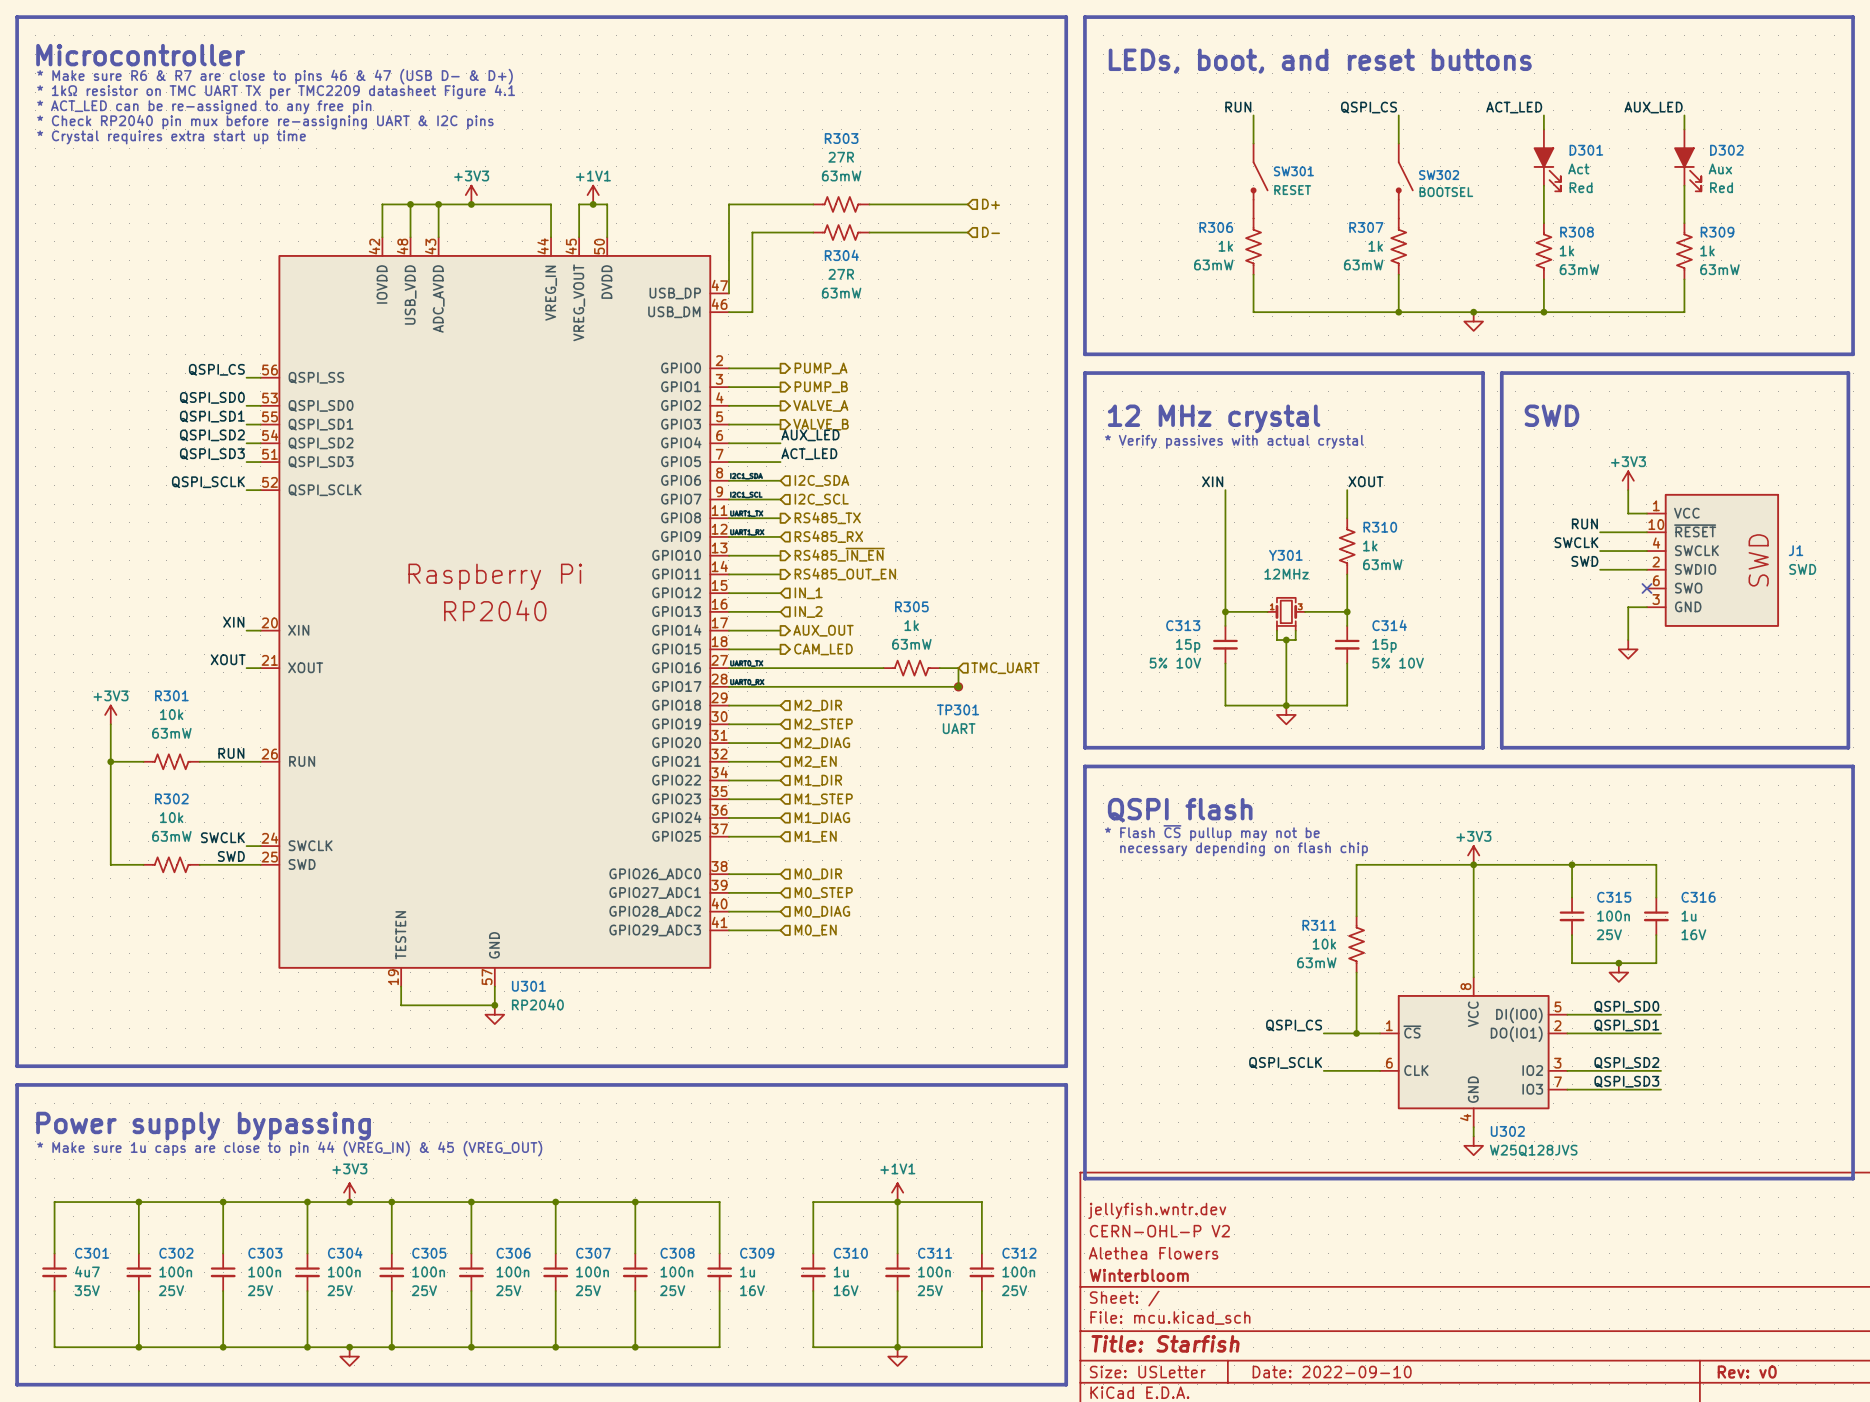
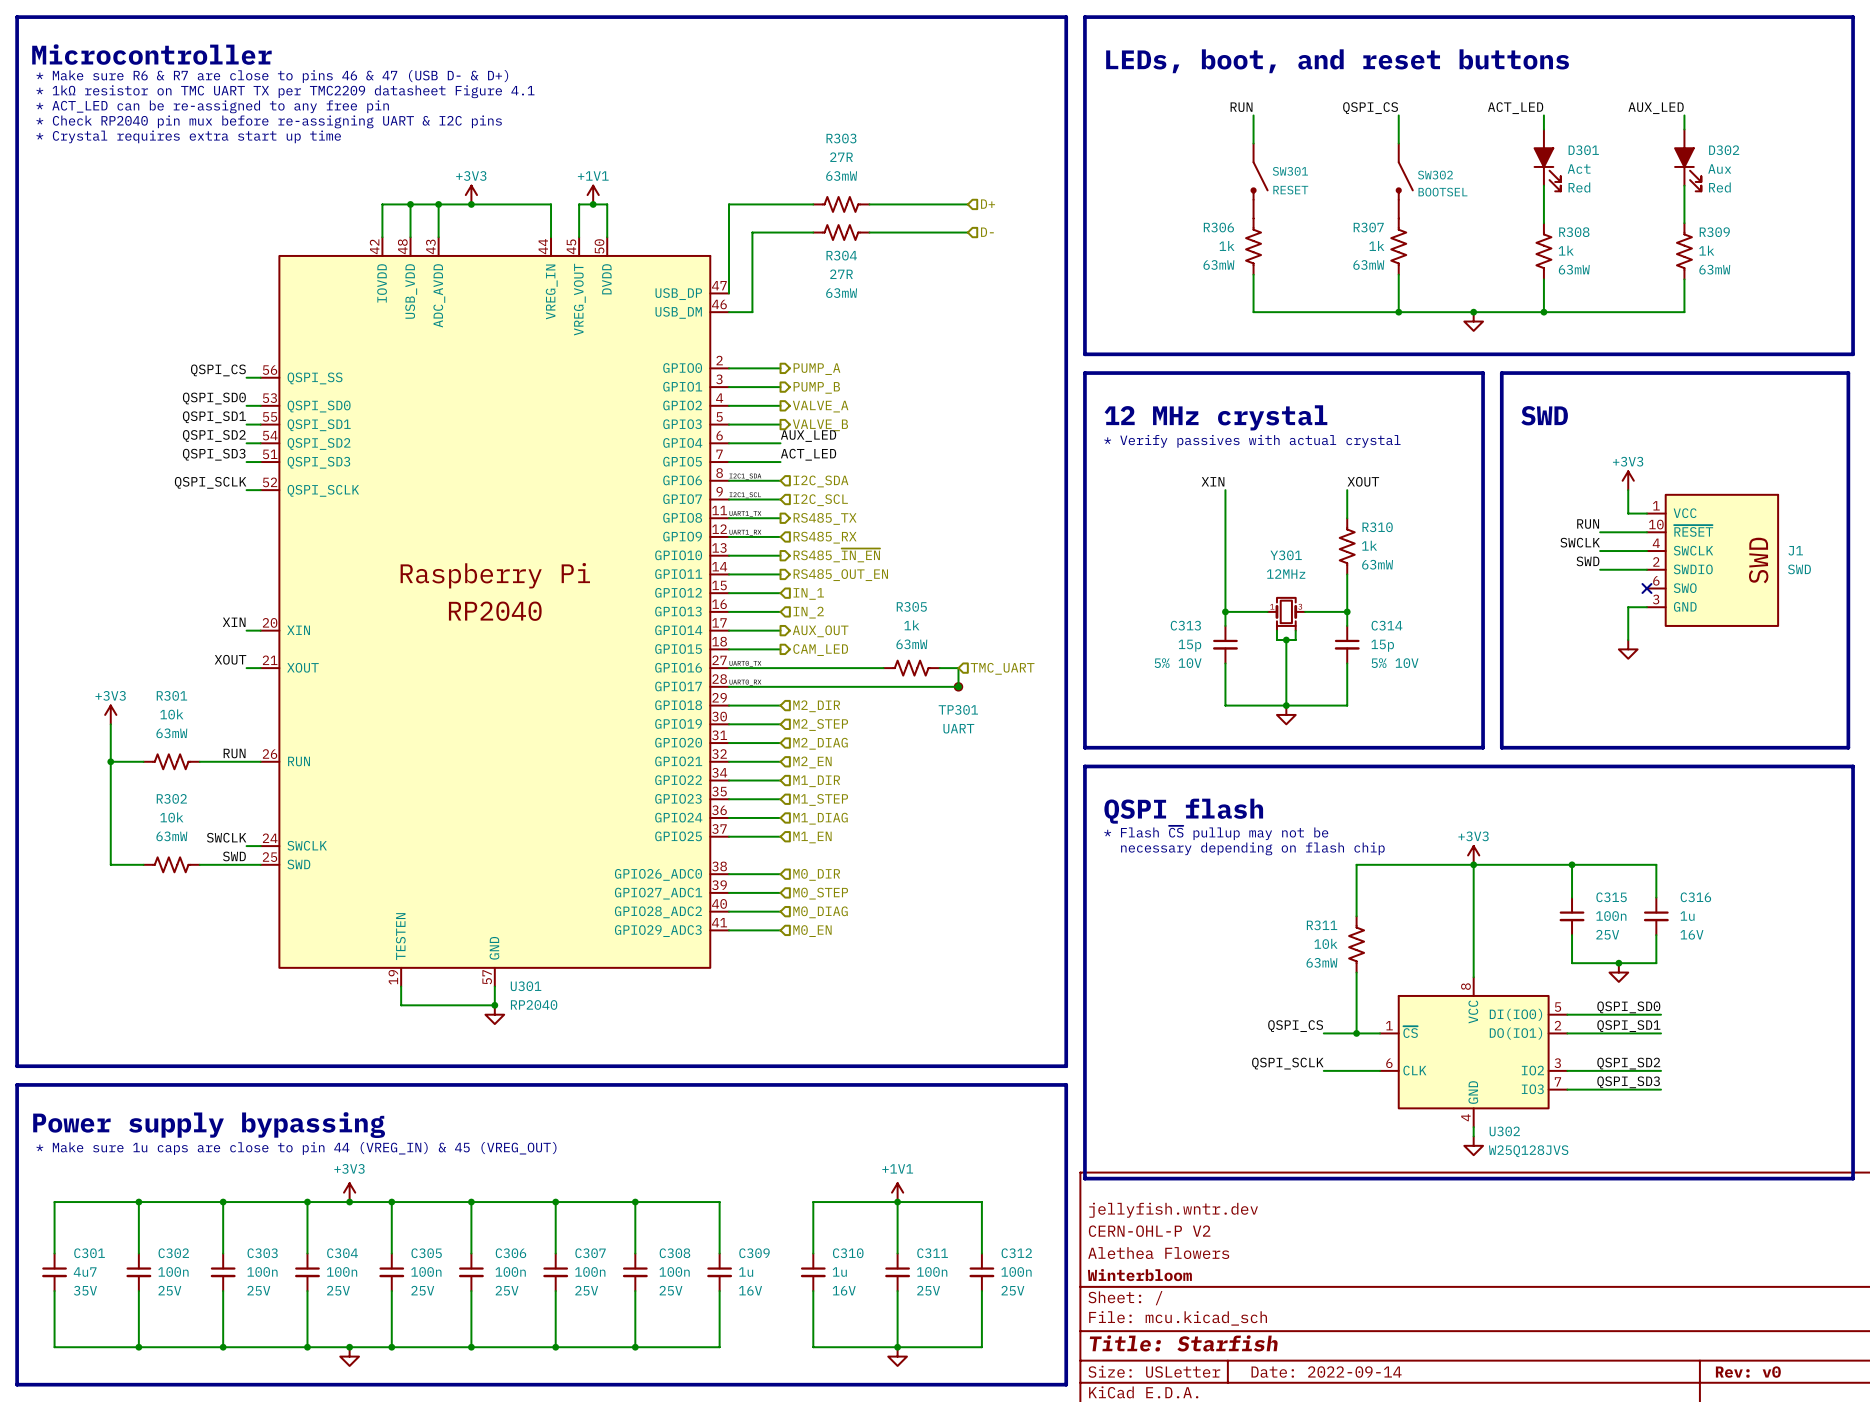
title block: Date: 2022-09-10 (1332, 1372) -> Date: 2022-09-14 (1326, 1372)

